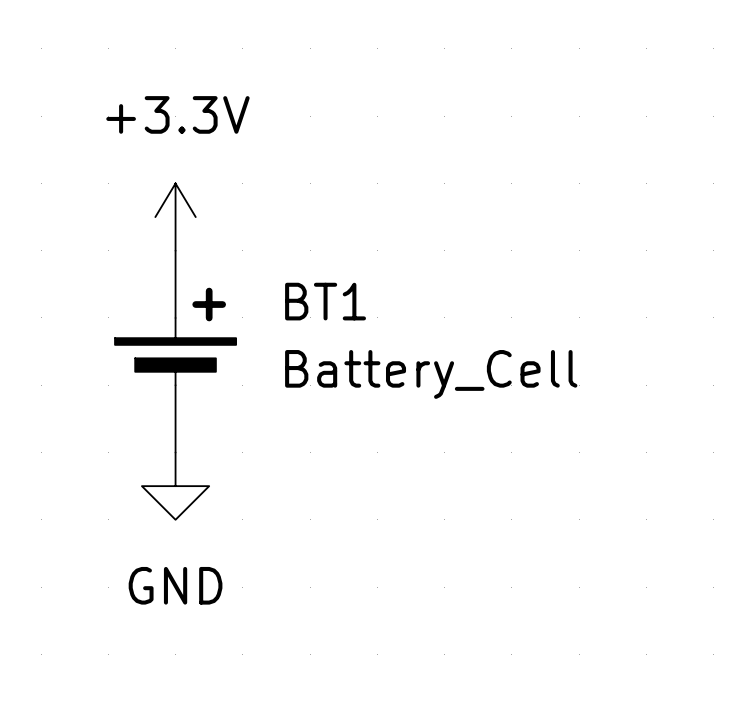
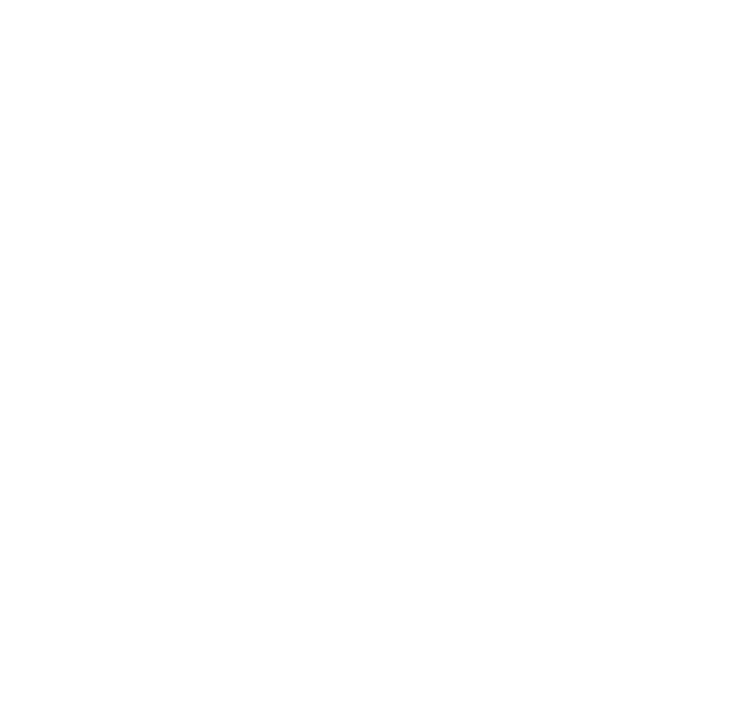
power symbol: +3.3V (175, 217) -> none
BT1: Battery_Cell (175, 351) -> none
power symbol: GND (175, 486) -> none

